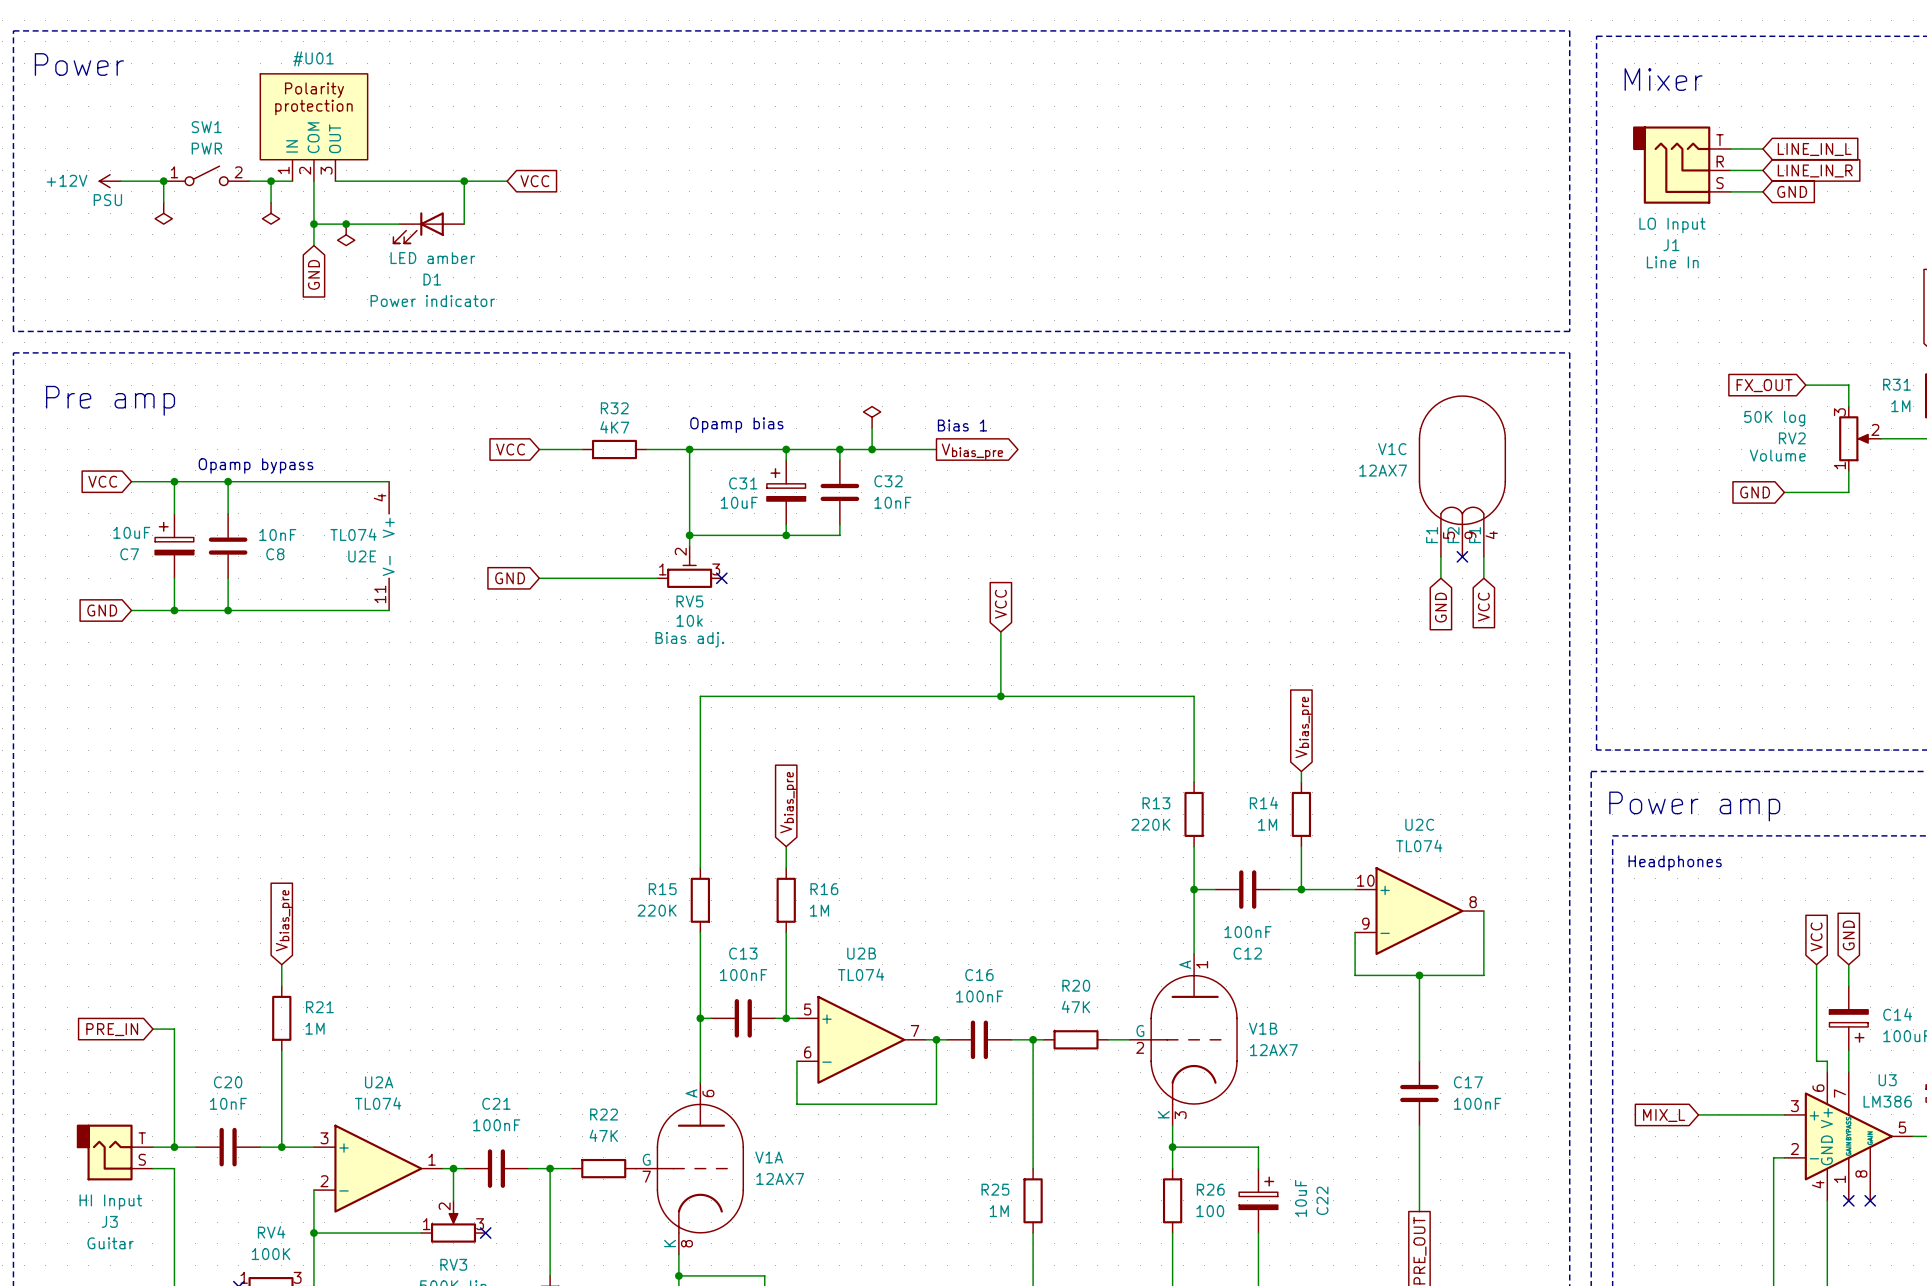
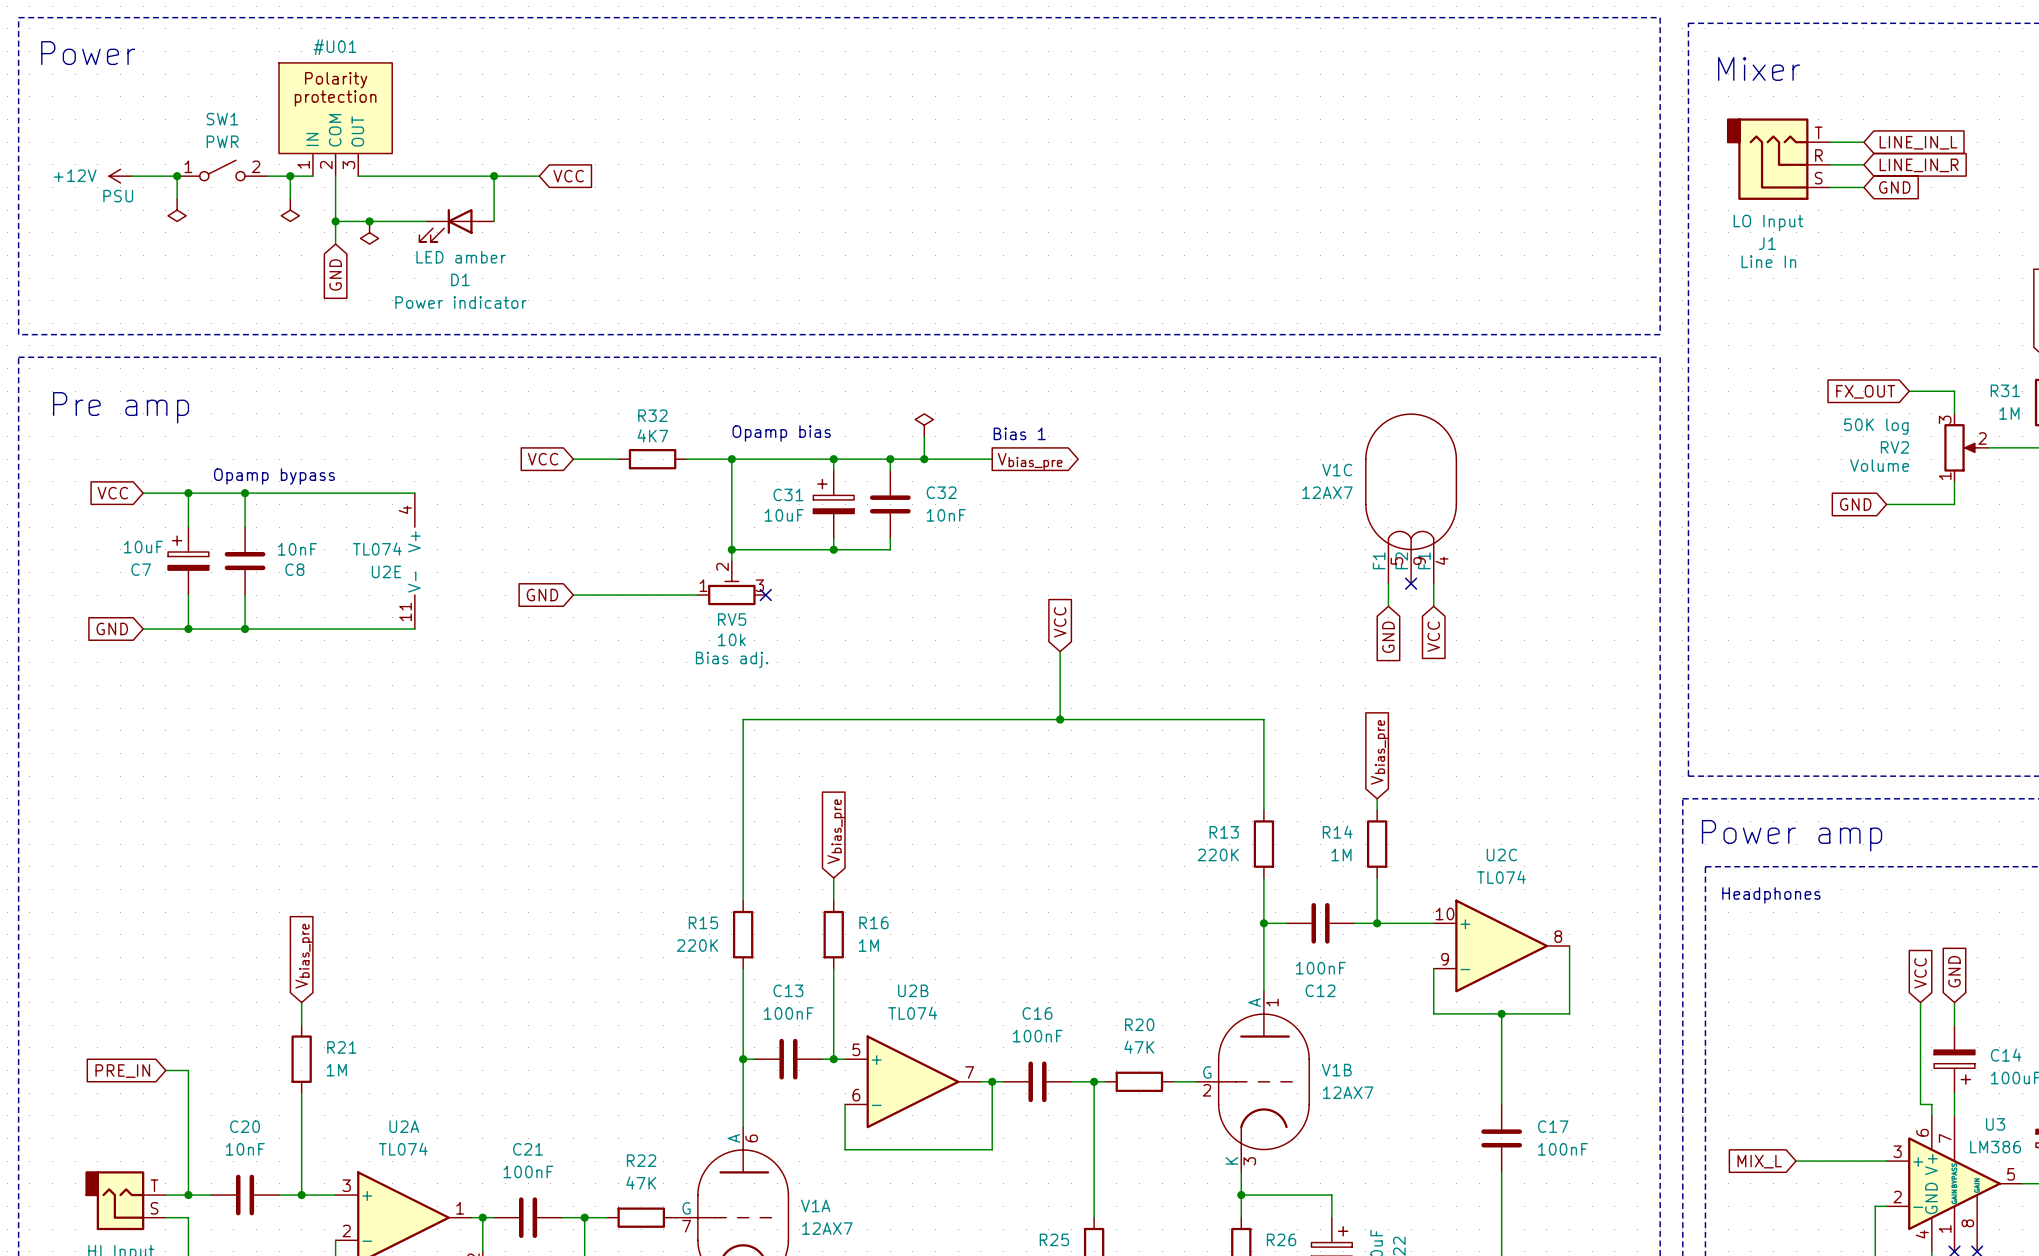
V1C position: (1462, 476) -> (1411, 498)
wire: (1440, 556) (1440, 578) -> (1433, 583) (1433, 606)
no-connect mark: (1462, 556) -> none
wire: (1483, 556) (1483, 578) -> (1388, 583) (1388, 606)
no-connect mark: none -> (1411, 583)
global label position: GND (1440, 607) -> GND (1388, 637)
global label position: VCC (1483, 607) -> VCC (1433, 636)

